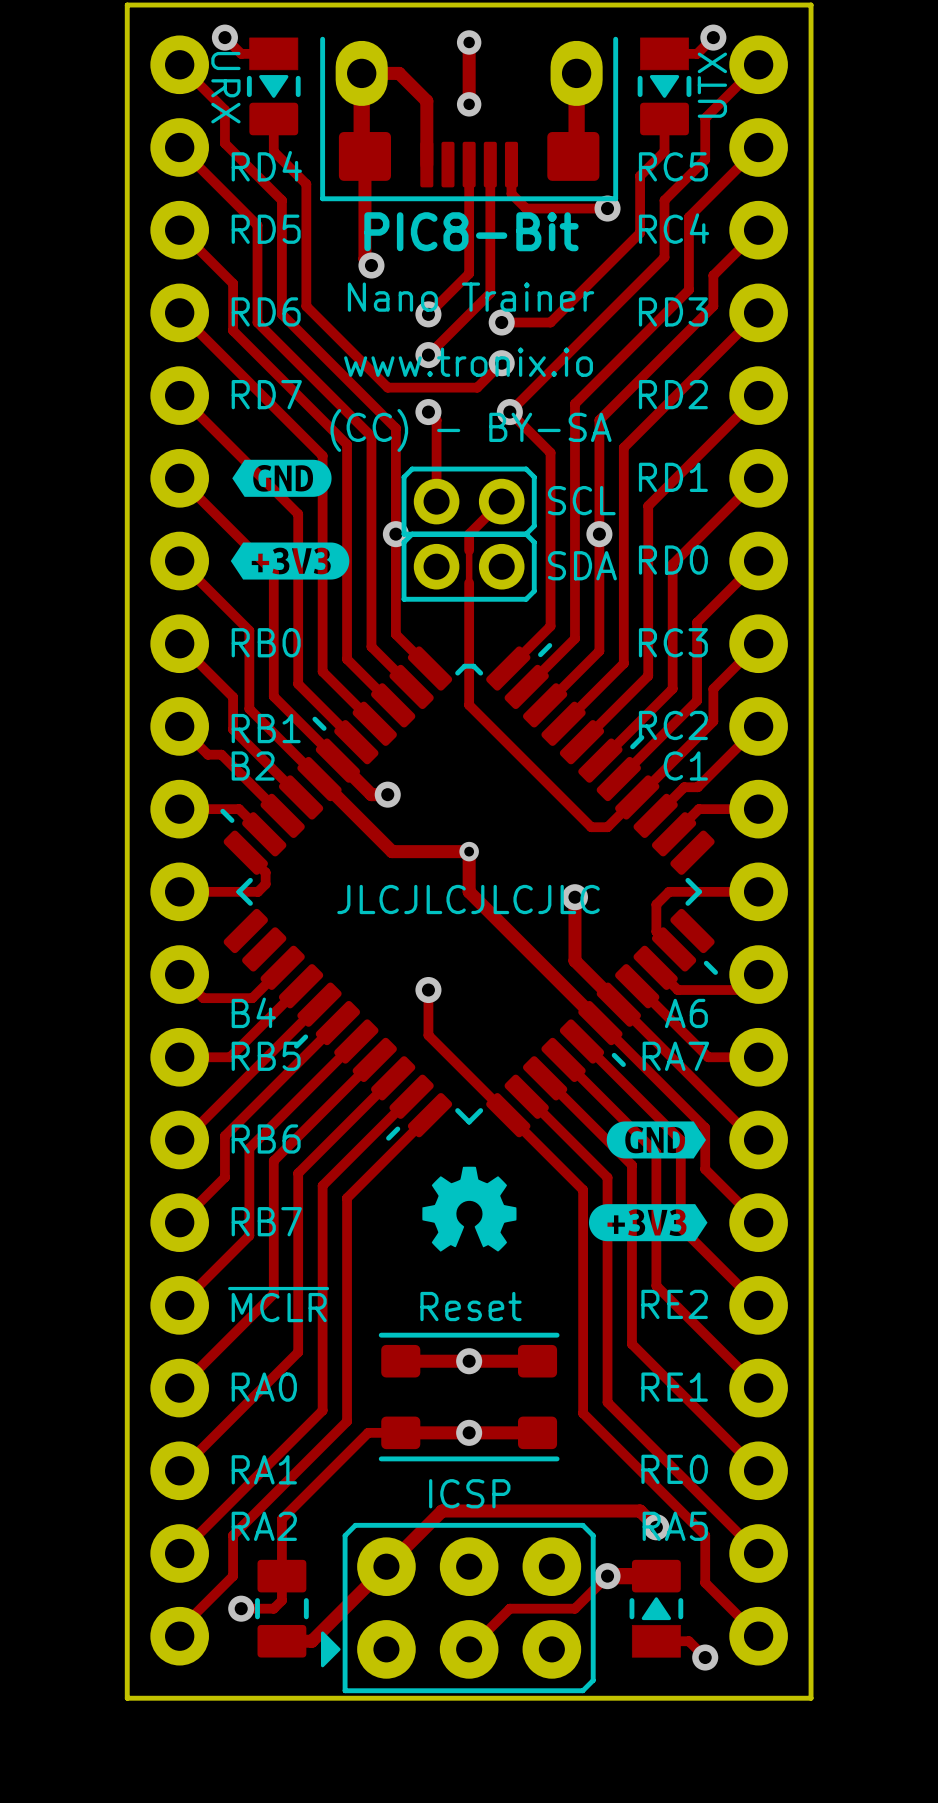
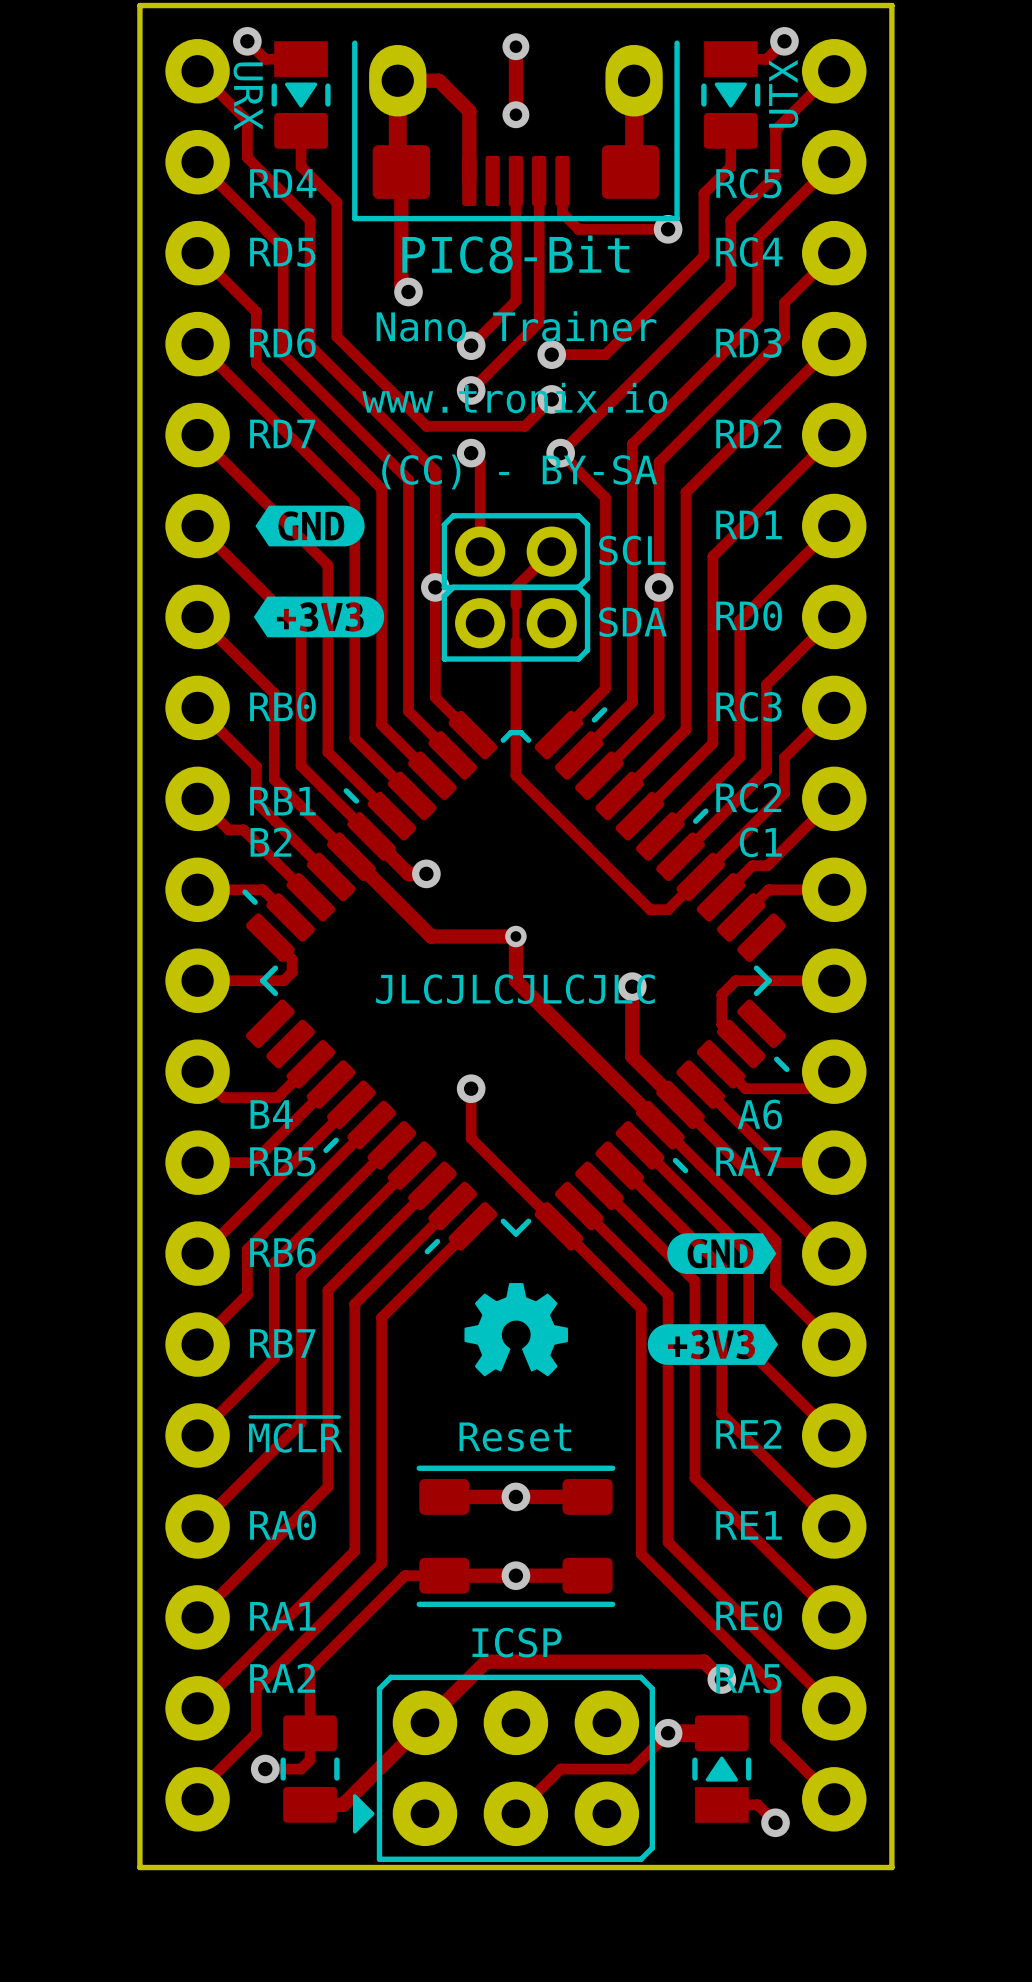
part footprint: [378, 1332, 560, 1462] -> [416, 1465, 616, 1608]

